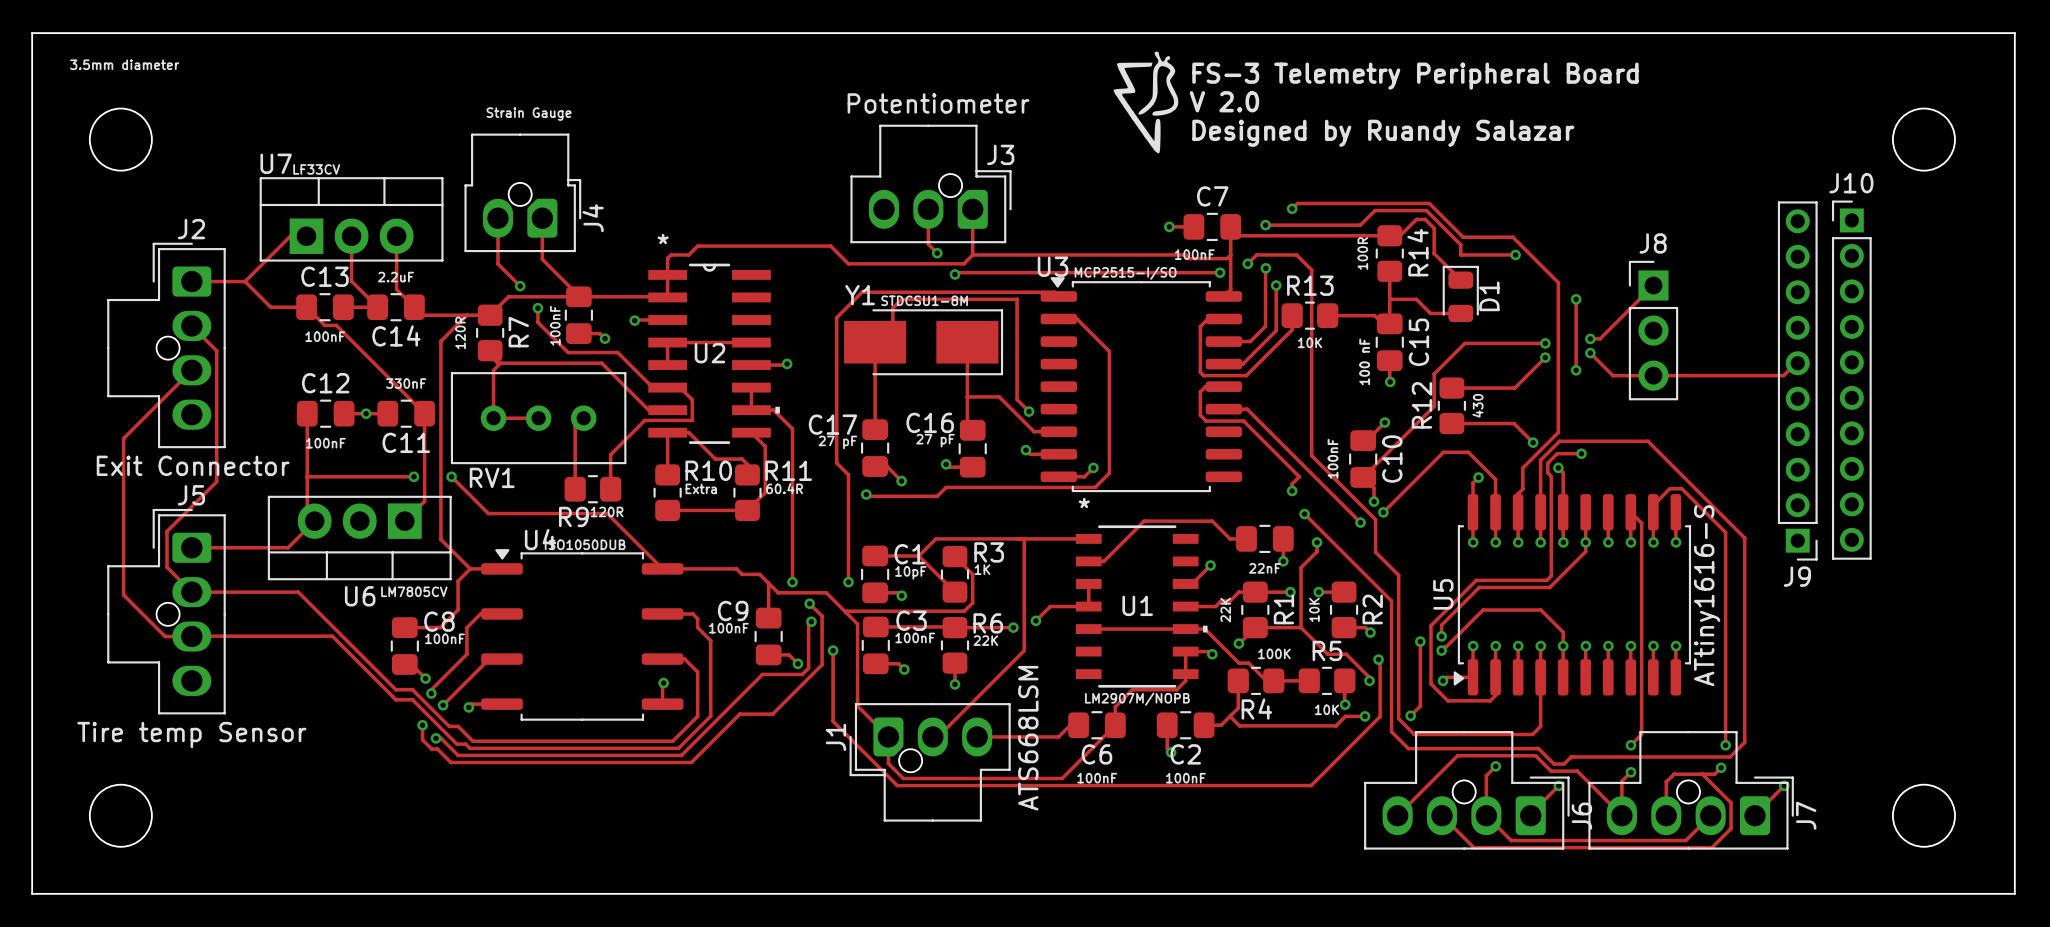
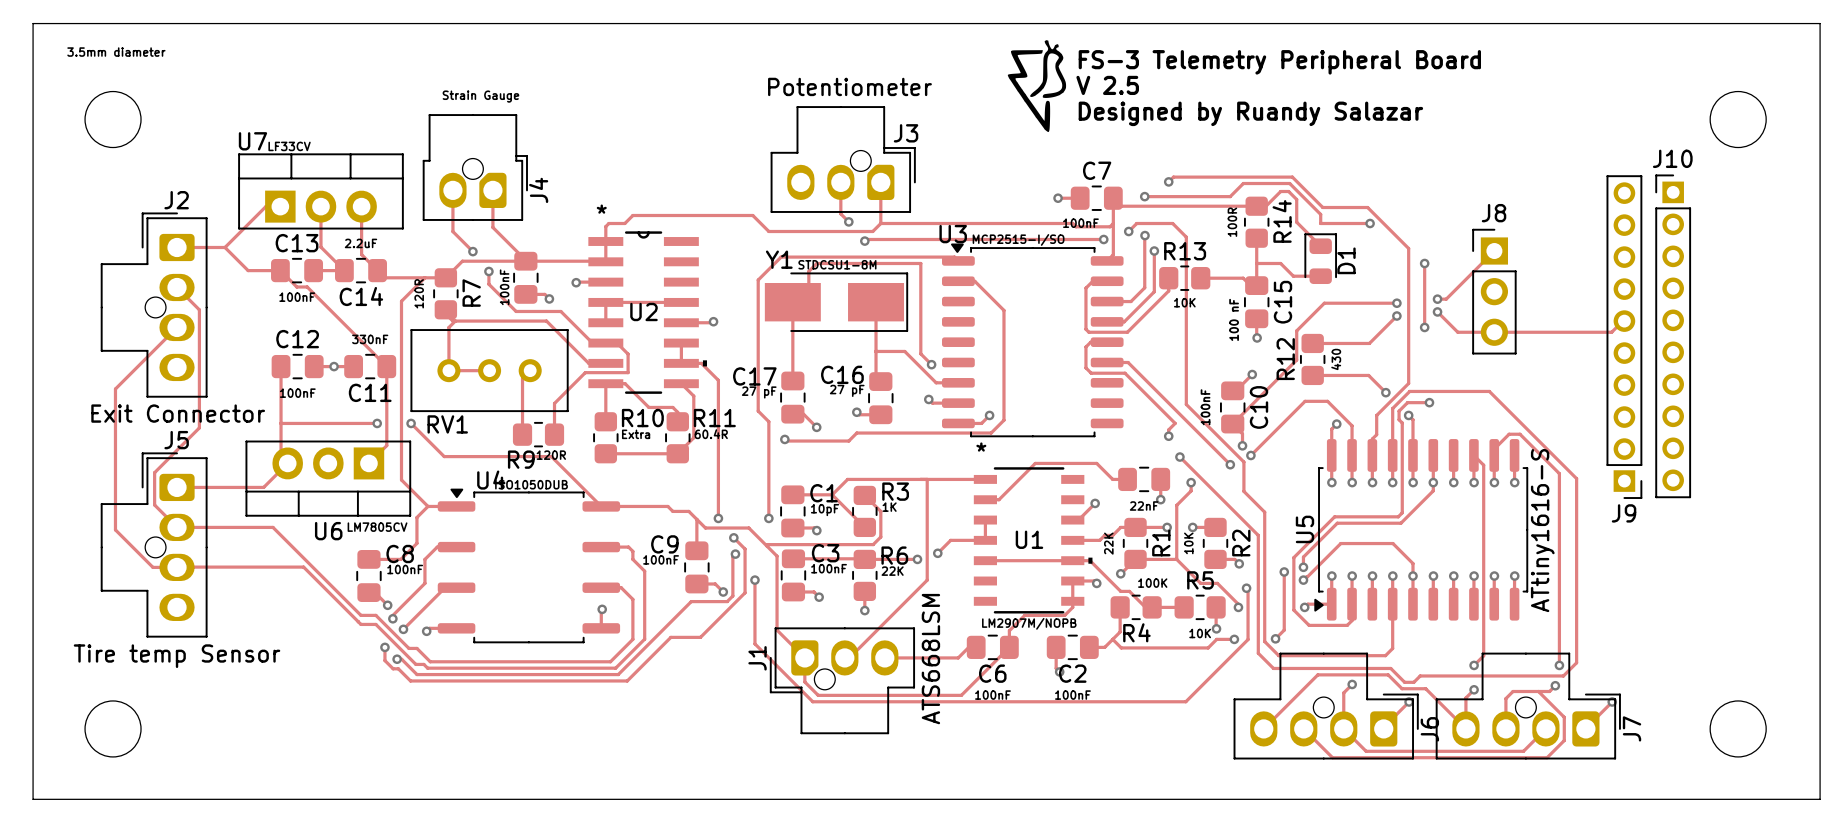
text: V 2.0 (1224, 101) -> V 2.5 (1107, 85)

